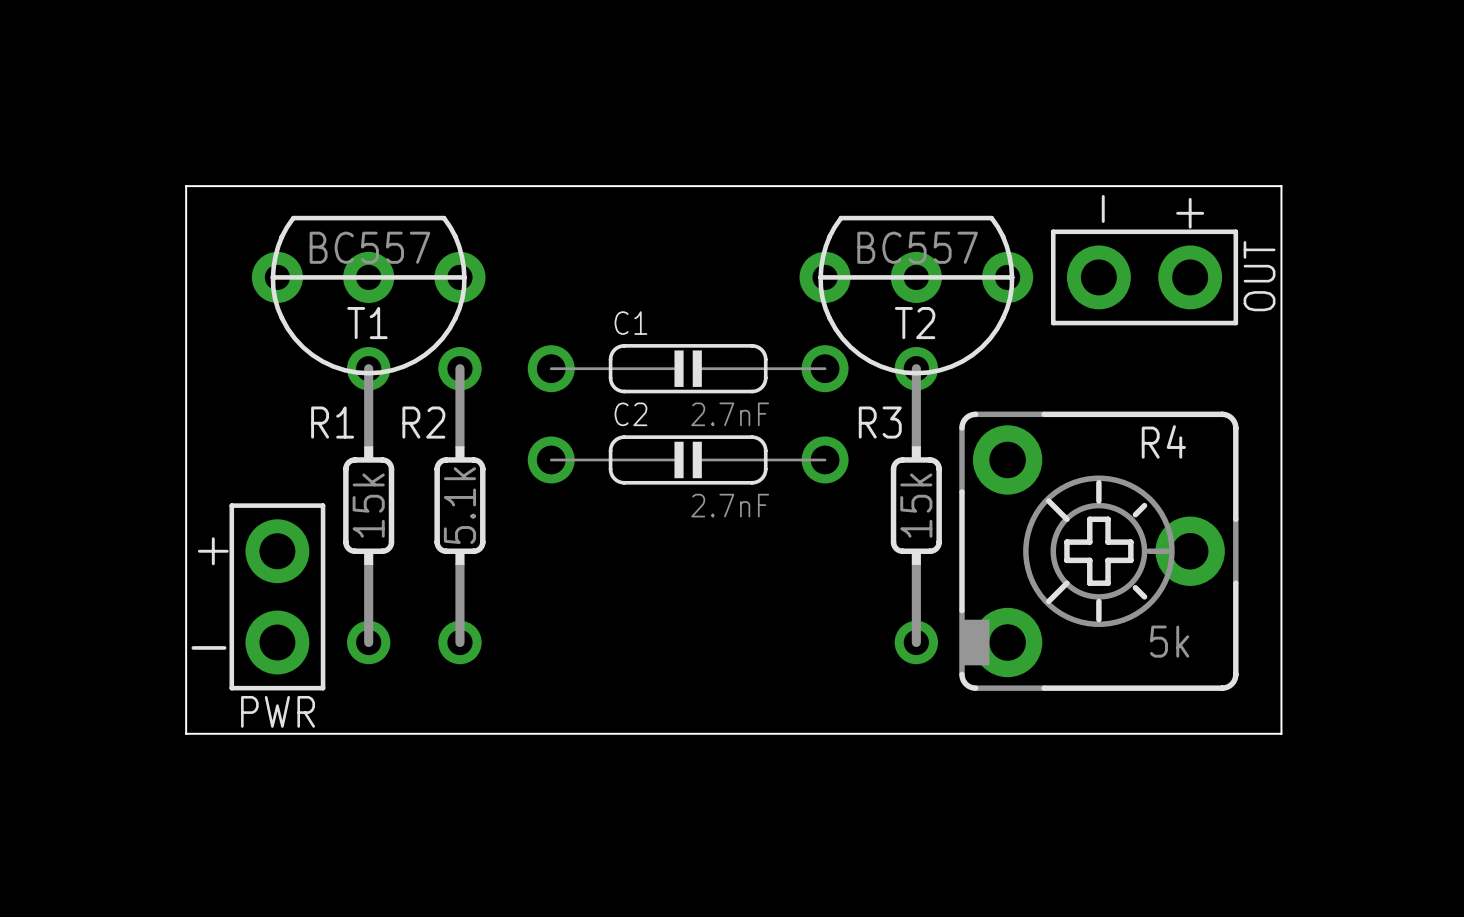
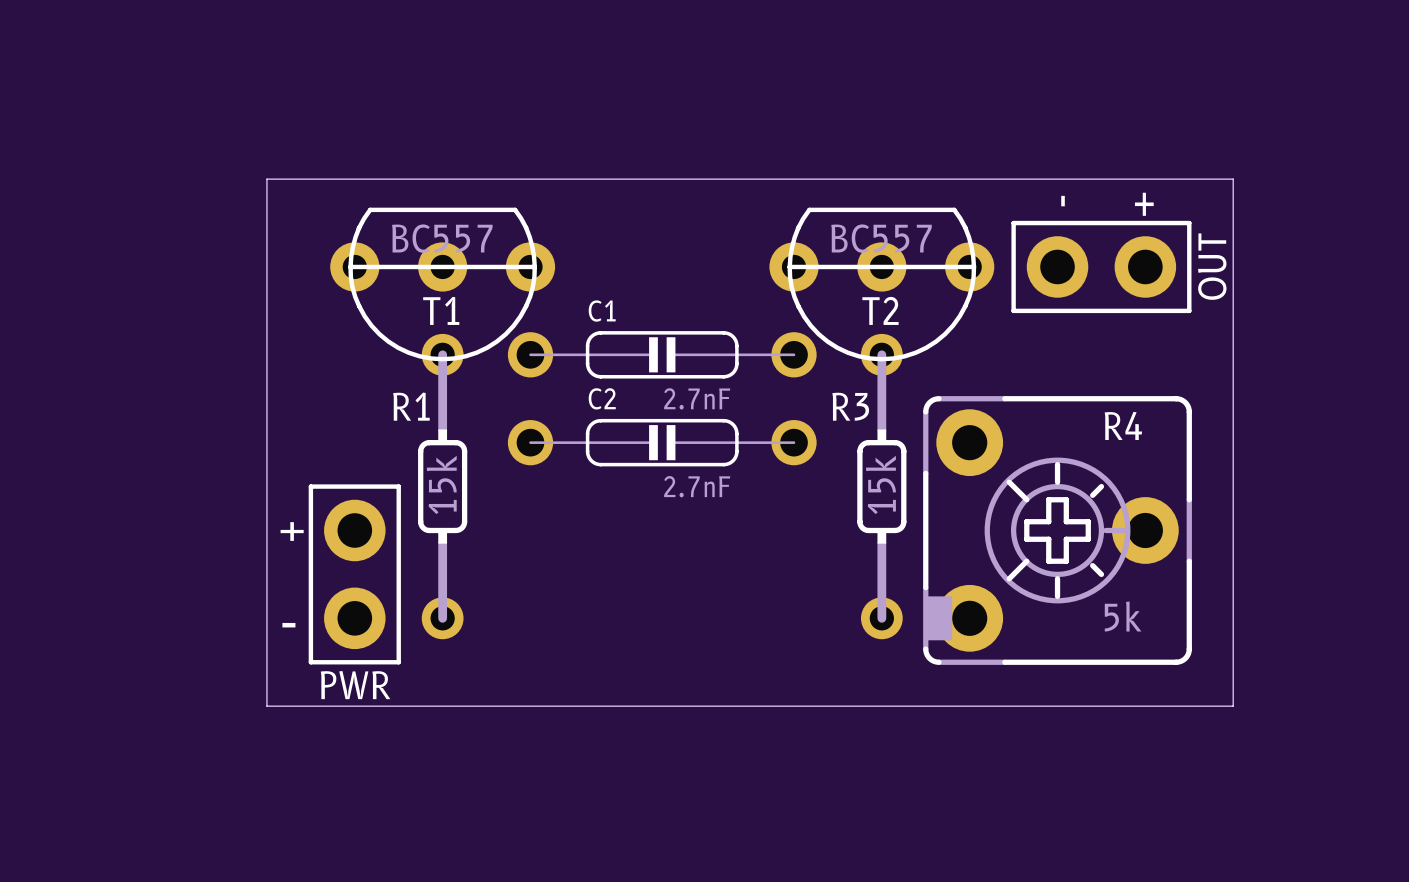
board edge: (277, 186) (186, 186) (186, 733) (277, 733) -> (266, 179) (266, 706)
T1 position: (368, 295) -> (442, 284)
R2 name: R2 (423, 422) -> R1 (411, 406)
R1: 15k (368, 505) -> none
R2 value: 5.1k (459, 505) -> 15k (441, 484)
part position: (277, 596) -> (354, 574)

